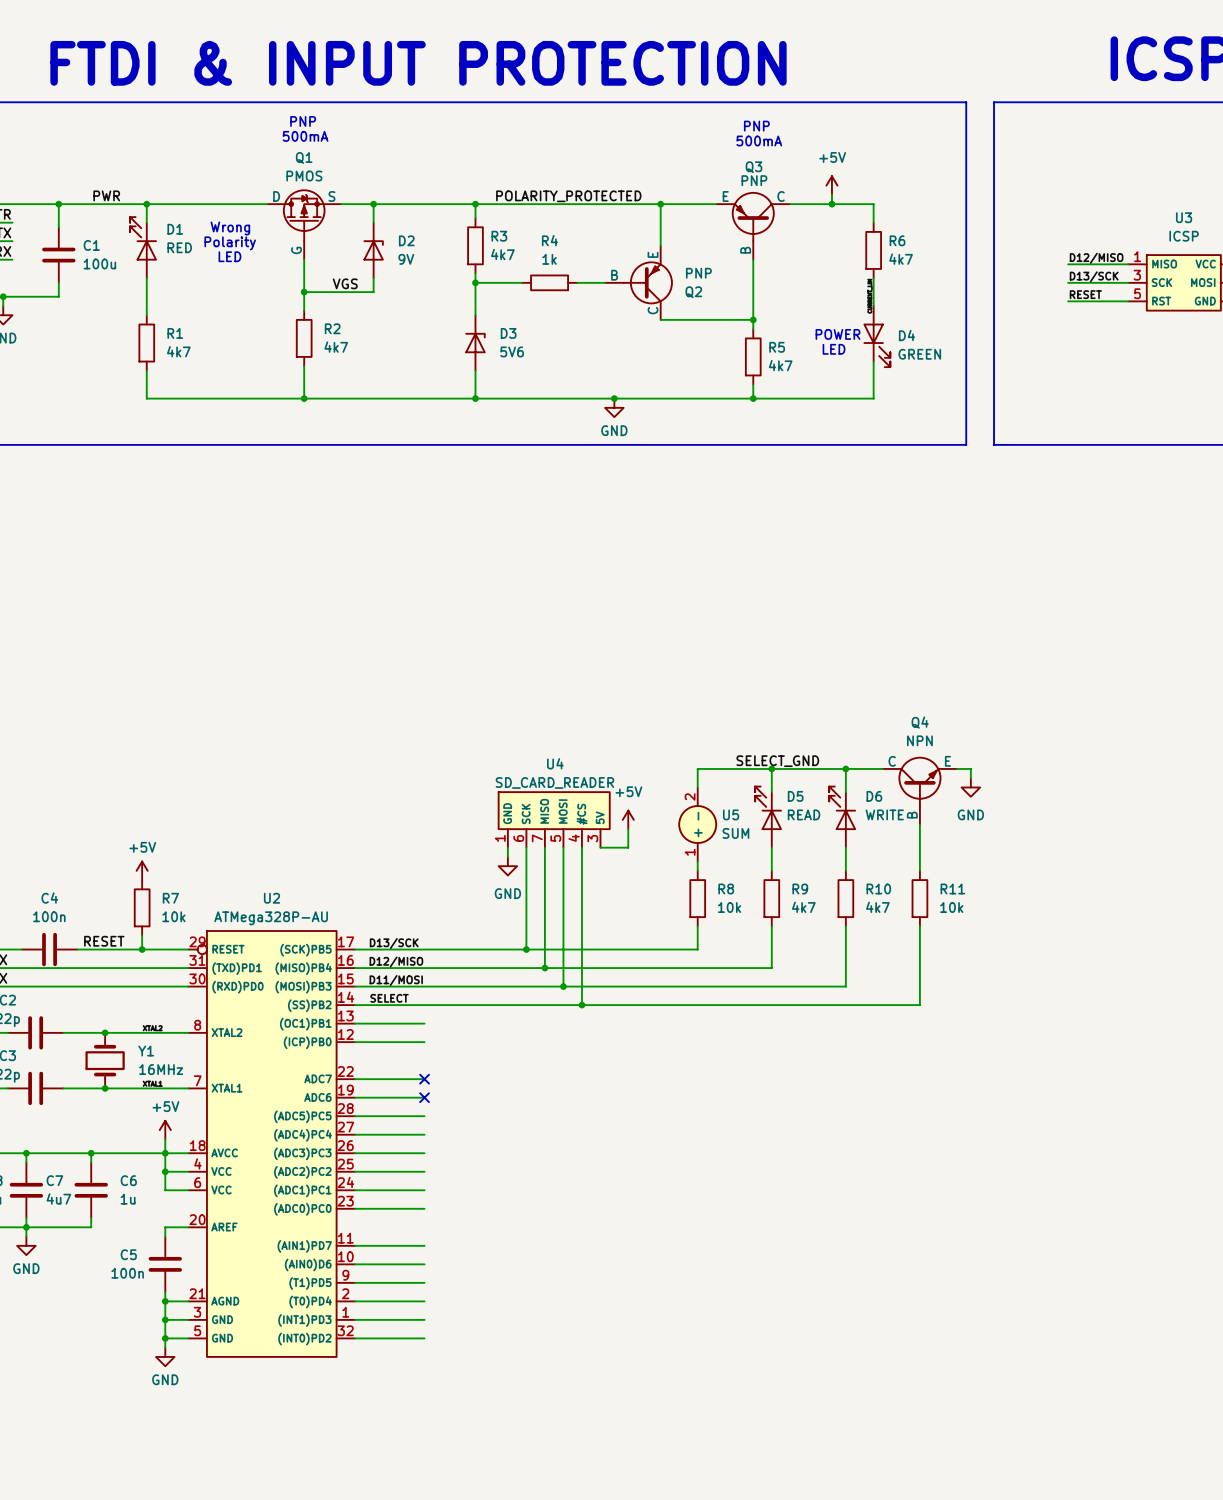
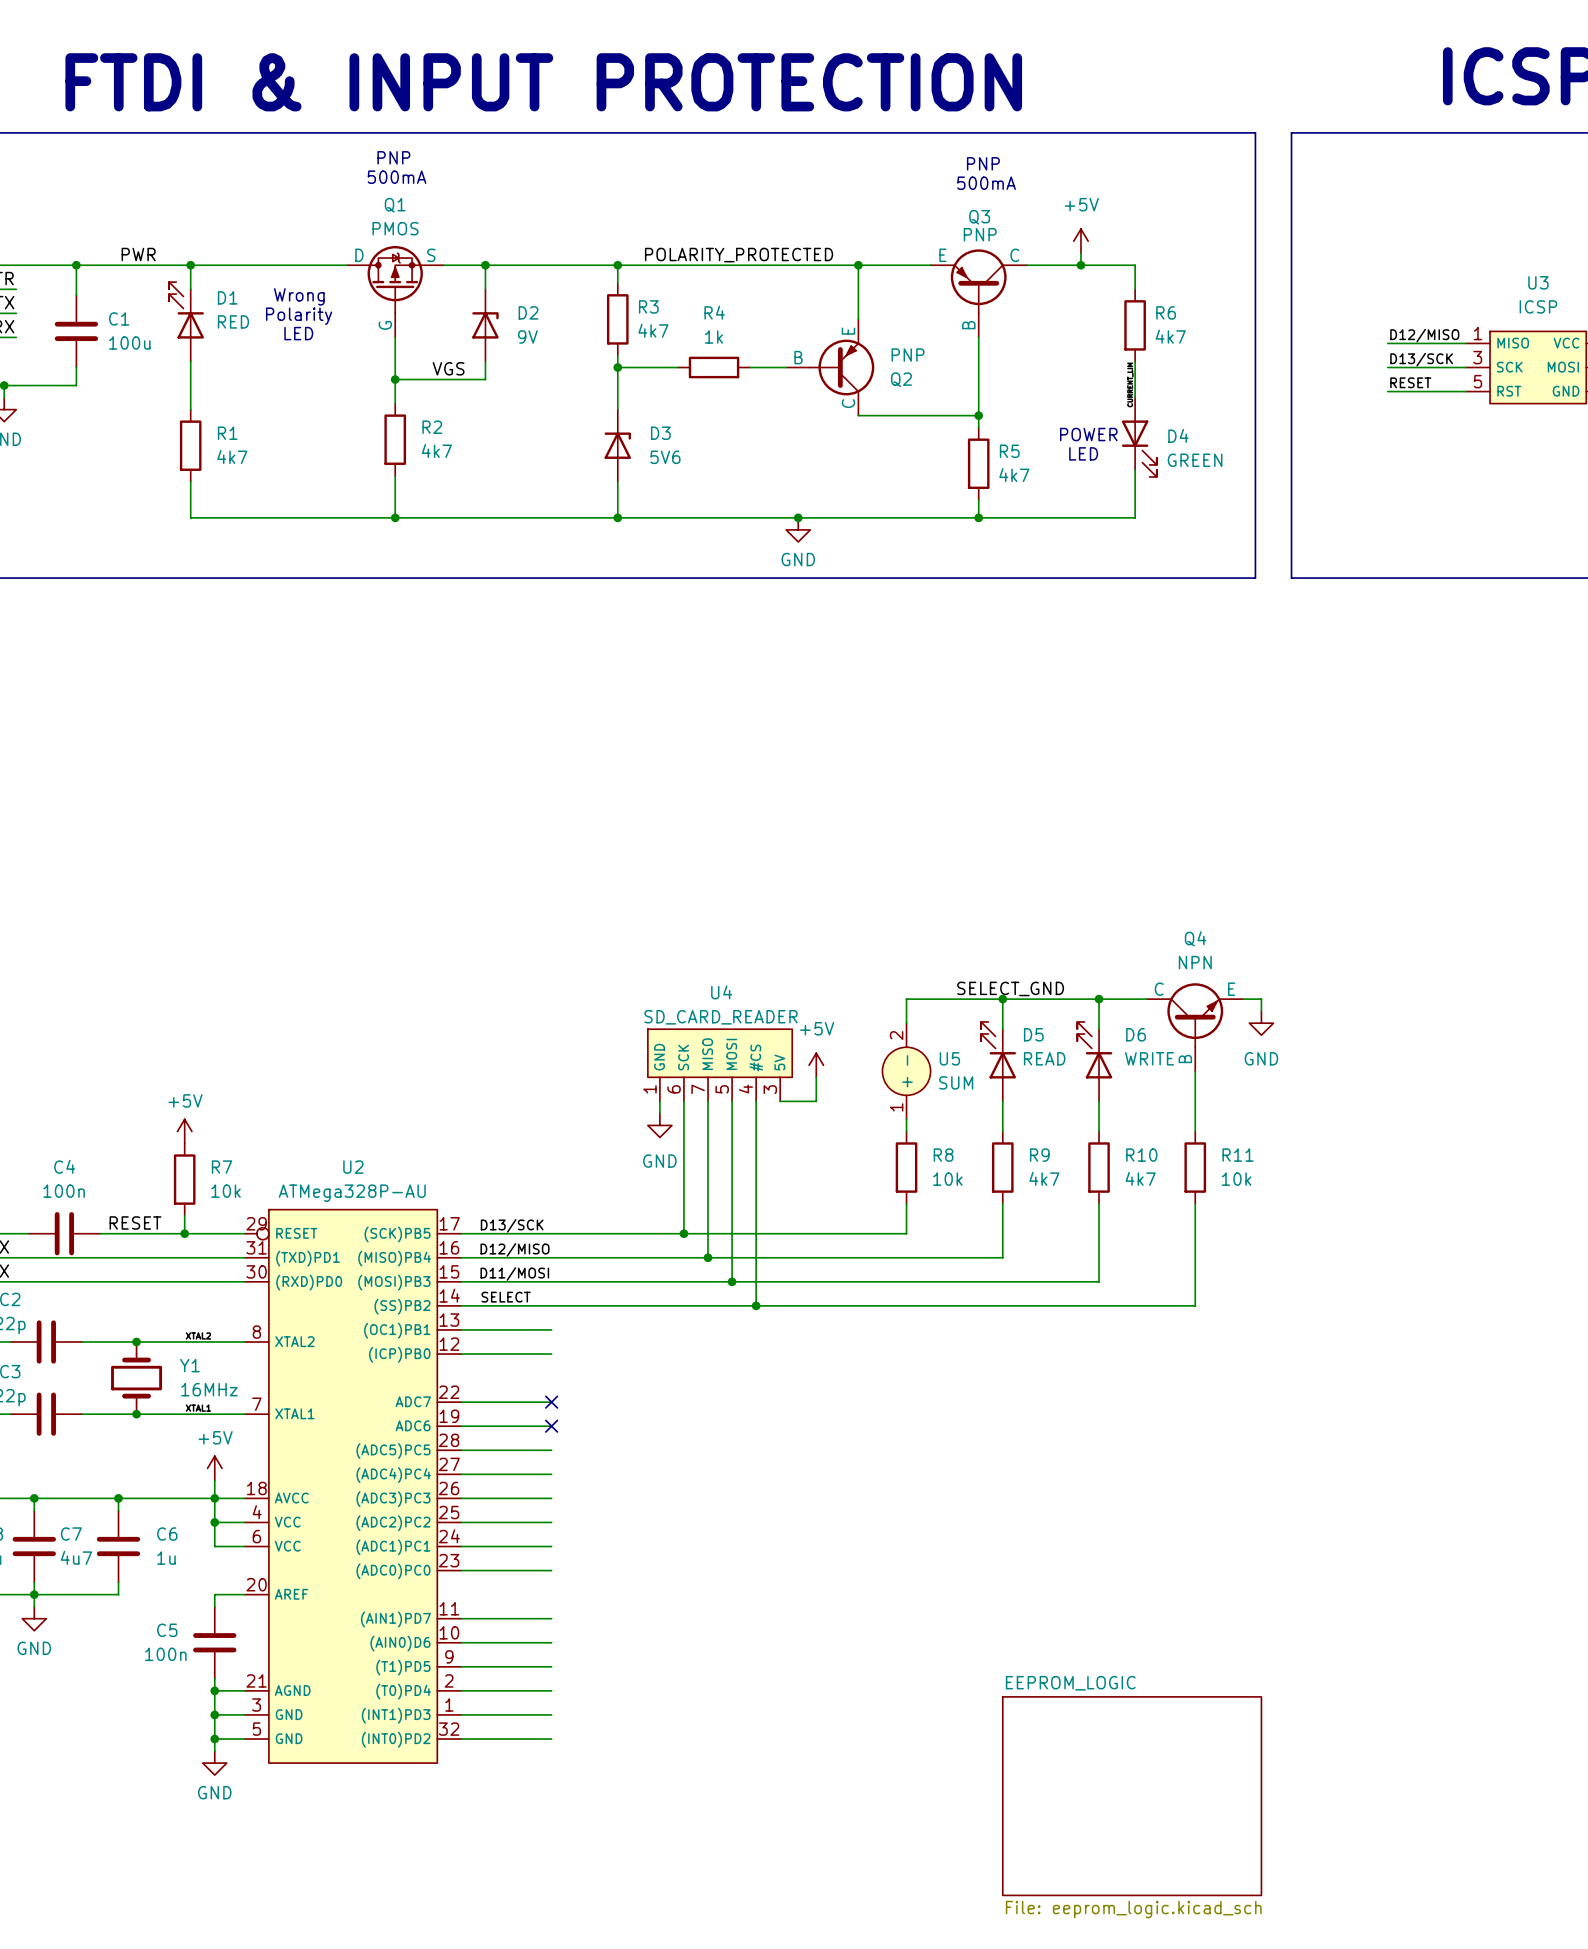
sheet EEPROM_LOGIC: none -> File: eeprom_logic.kicad_sch (1132, 1796)

